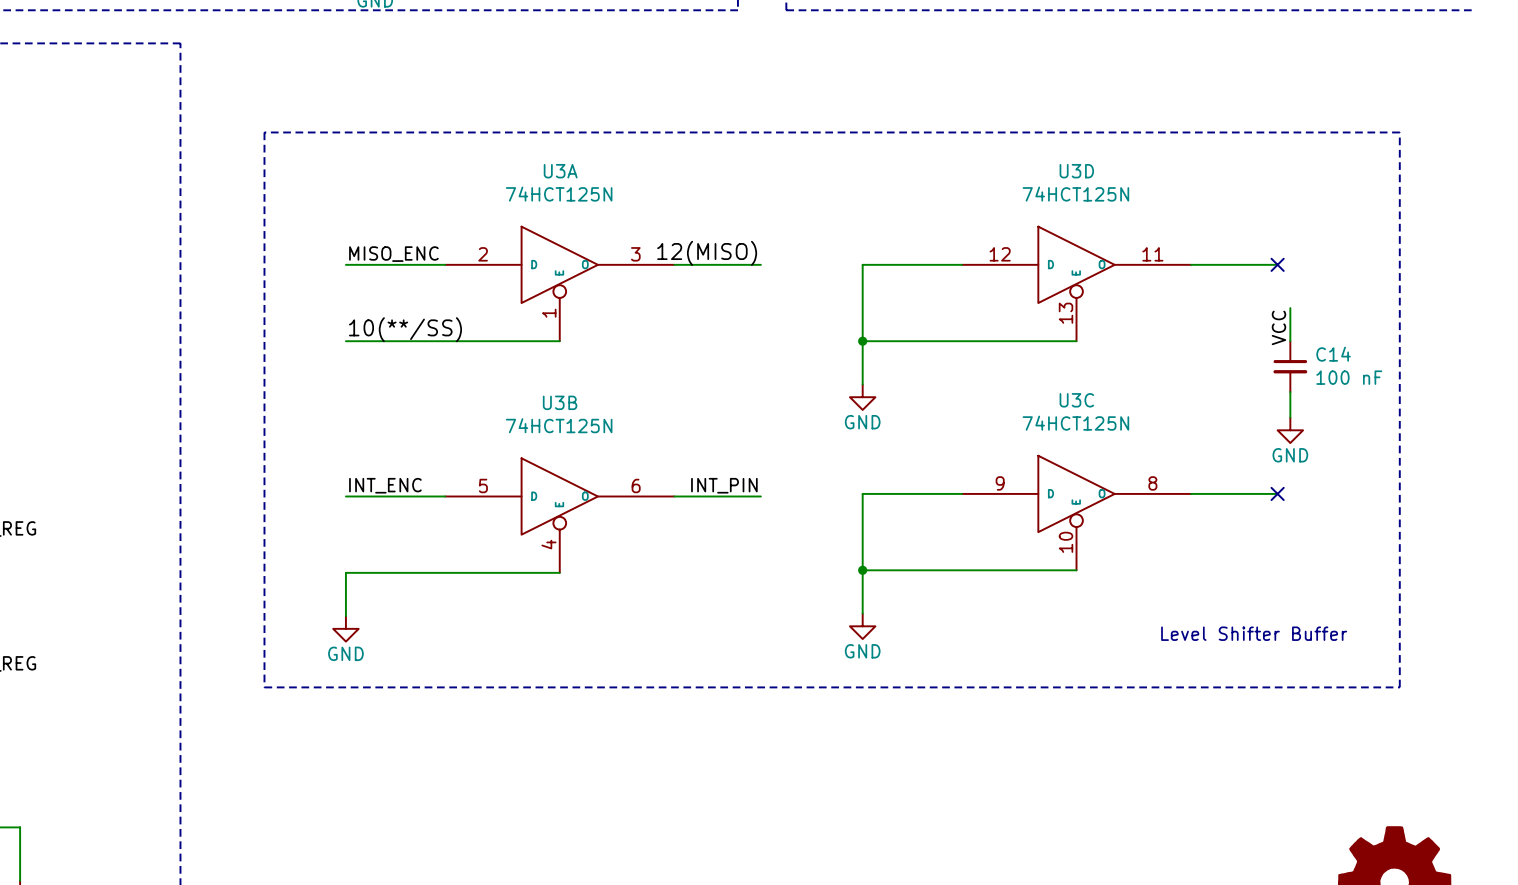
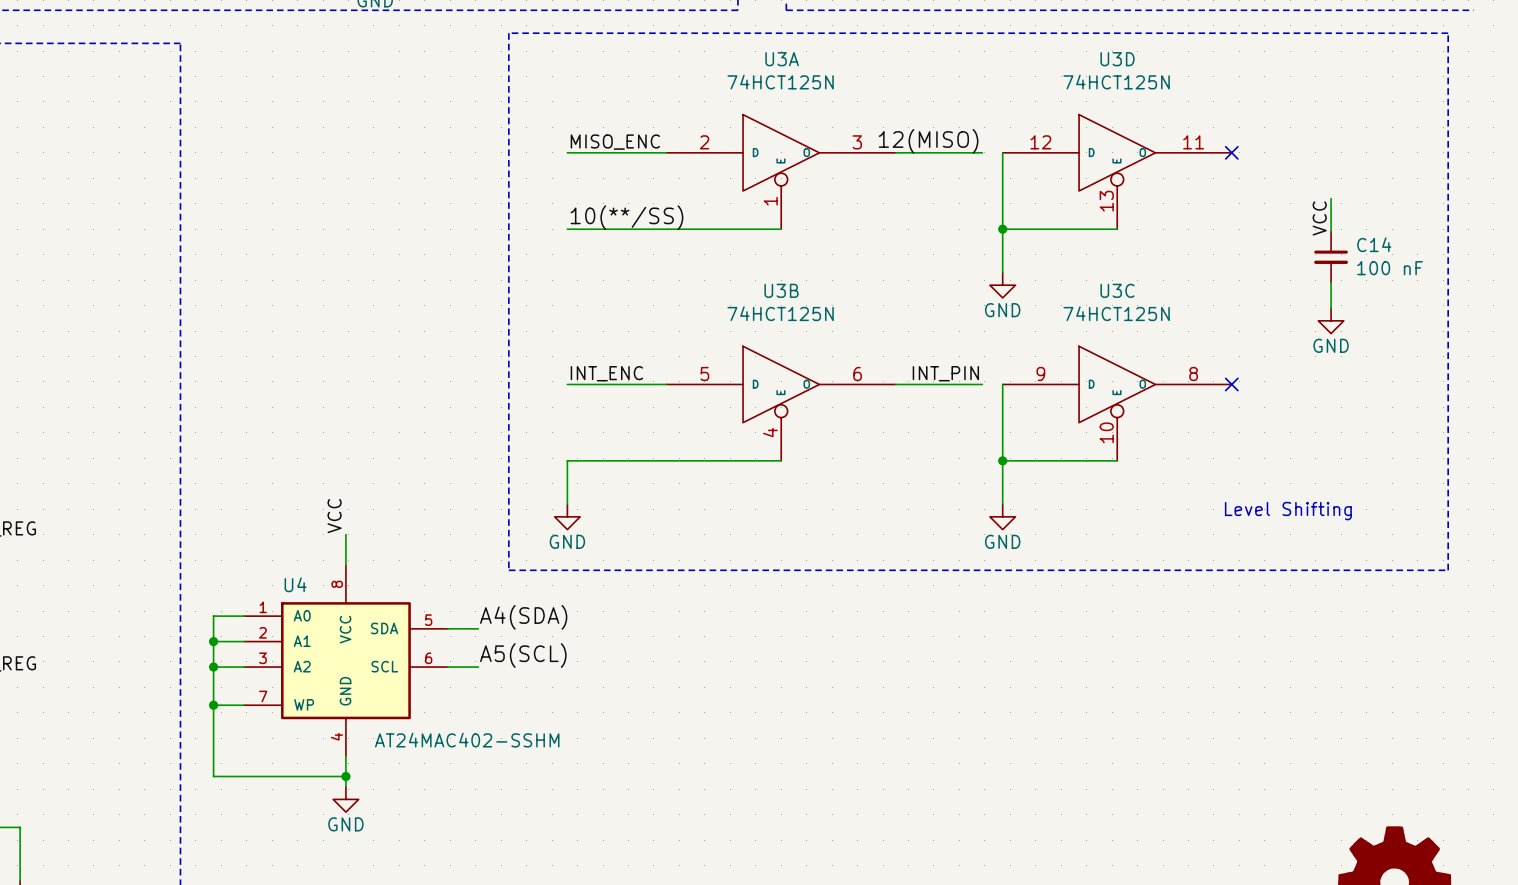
line: (264, 132) (264, 687) (1399, 687) (1399, 132) (264, 132) -> (508, 33) (508, 570) (1448, 570) (1448, 33) (508, 33)
wire: none -> (1002, 152) (1002, 272)
no-connect mark: none -> (1231, 152)
wire: none -> (1002, 229) (1117, 229)
junction: none -> (1002, 229)
label position: 12(MISO) (707, 253) -> 12(MISO) (928, 141)
label position: MISO_ENC (393, 254) -> MISO_ENC (615, 142)
wire: (345, 264) (445, 264) -> (567, 152) (666, 152)
wire: (674, 264) (760, 264) -> (895, 152) (982, 152)
wire: (961, 264) (862, 264) (862, 384) -> none
wire: (1191, 264) (1277, 264) -> none
no-connect mark: (1277, 264) -> none
U3A position: (559, 283) -> (781, 171)
U3D position: (1076, 283) -> (1117, 171)
power symbol: none -> GND (1002, 285)
wire: (1290, 308) (1290, 341) -> (1331, 198) (1331, 231)
label position: VCC (1278, 327) -> VCC (1319, 218)
label position: 10(**/SS) (405, 329) -> 10(**/SS) (626, 217)
wire: (345, 341) (559, 341) -> (567, 229) (781, 229)
wire: (862, 341) (1076, 341) -> none
junction: (862, 341) -> none
C14 position: (1290, 366) -> (1331, 257)
wire: none -> (1002, 384) (1002, 504)
no-connect mark: none -> (1231, 384)
wire: (1290, 392) (1290, 417) -> (1331, 282) (1331, 308)
power symbol: GND (862, 397) -> none
power symbol position: GND (1290, 430) -> GND (1331, 320)
wire: none -> (1002, 460) (1117, 460)
junction: none -> (1002, 460)
label position: INT_ENC (385, 485) -> INT_ENC (606, 373)
label position: INT_PIN (724, 485) -> INT_PIN (945, 373)
wire: (961, 493) (862, 493) (862, 613) -> none
wire: (1191, 493) (1277, 493) -> none
no-connect mark: (1277, 493) -> none
wire: (345, 496) (445, 496) -> (567, 384) (666, 384)
wire: (674, 496) (760, 496) -> (895, 384) (982, 384)
text: none -> Level Shifting (1288, 511)
U3C position: (1076, 513) -> (1117, 403)
U3B position: (559, 515) -> (781, 403)
label: none -> VCC (334, 516)
power symbol: none -> GND (567, 516)
power symbol: none -> GND (1002, 516)
wire: none -> (345, 534) (345, 565)
junction: (862, 570) -> none
wire: (559, 572) (345, 572) (345, 616) -> (781, 460) (567, 460) (567, 504)
wire: none -> (244, 616) (213, 616) (213, 776) (345, 776)
label: none -> A4(SDA) (523, 617)
power symbol: GND (862, 626) -> none
power symbol: GND (345, 628) -> none
wire: none -> (447, 628) (478, 628)
text: Level Shifter Buffer (1254, 633) -> none
wire: none -> (213, 641) (244, 641)
junction: none -> (213, 641)
label: none -> A5(SCL) (523, 655)
U4: none -> AT24MAC402-SSHM (345, 660)
wire: none -> (213, 667) (244, 667)
junction: none -> (213, 667)
wire: none -> (447, 667) (478, 667)
wire: none -> (213, 705) (244, 705)
junction: none -> (213, 705)
wire: none -> (345, 756) (345, 786)
junction: none -> (345, 776)
power symbol: none -> GND (345, 799)

